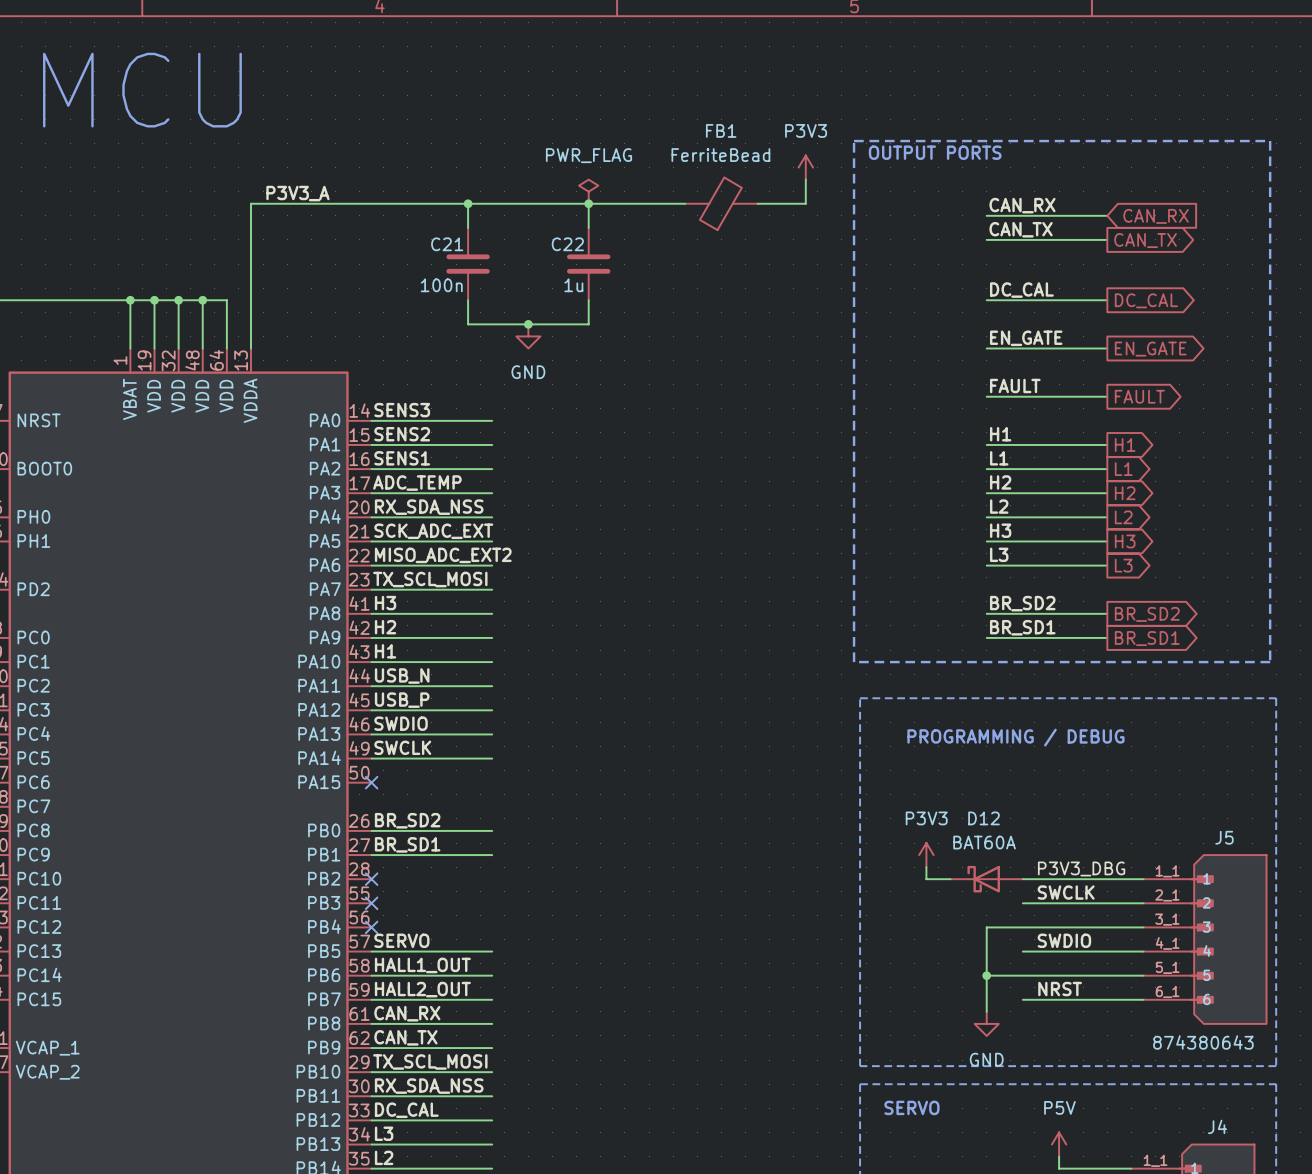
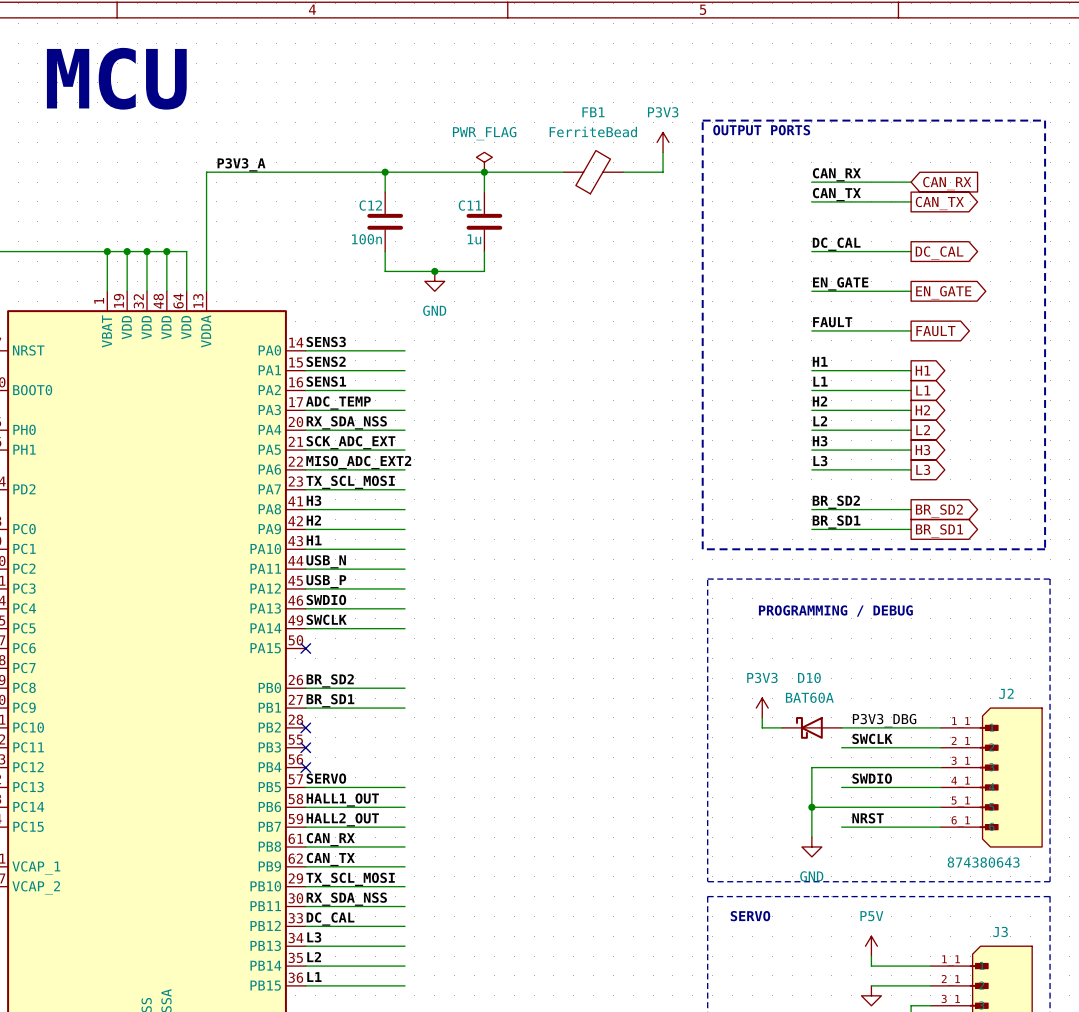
C21 name: C21 (447, 244) -> C12 (370, 205)
C22 name: C22 (567, 244) -> C11 (470, 205)
D12 name: D12 (983, 818) -> D10 (809, 677)
J5 name: J5 (1224, 837) -> J2 (1006, 693)
J4 name: J4 (1217, 1126) -> J3 (1000, 931)

